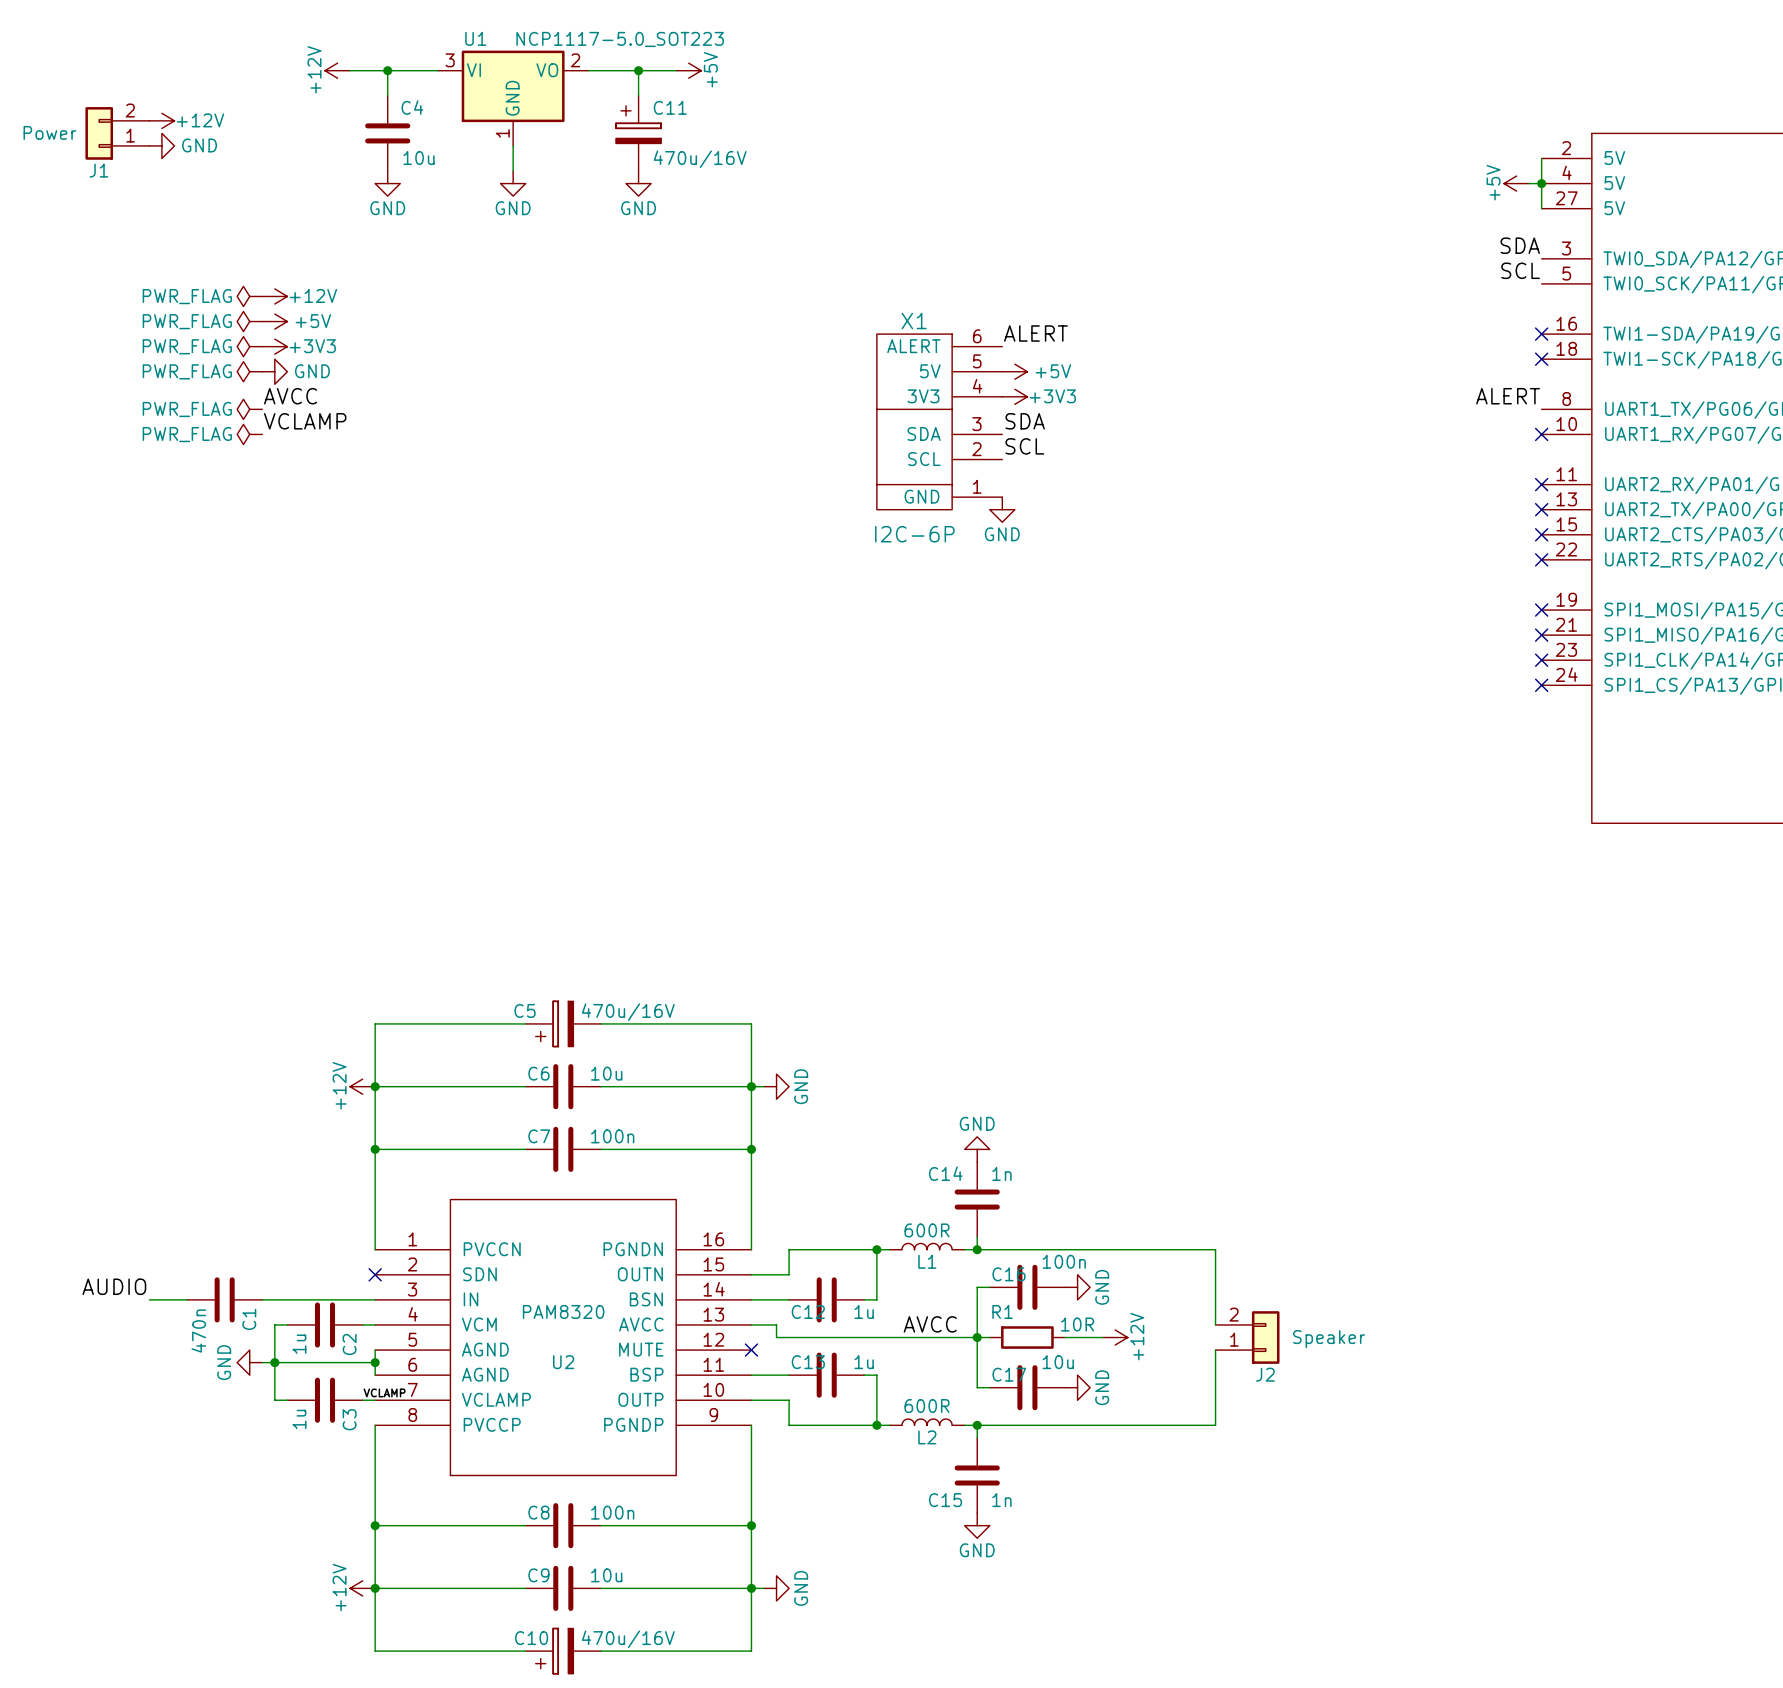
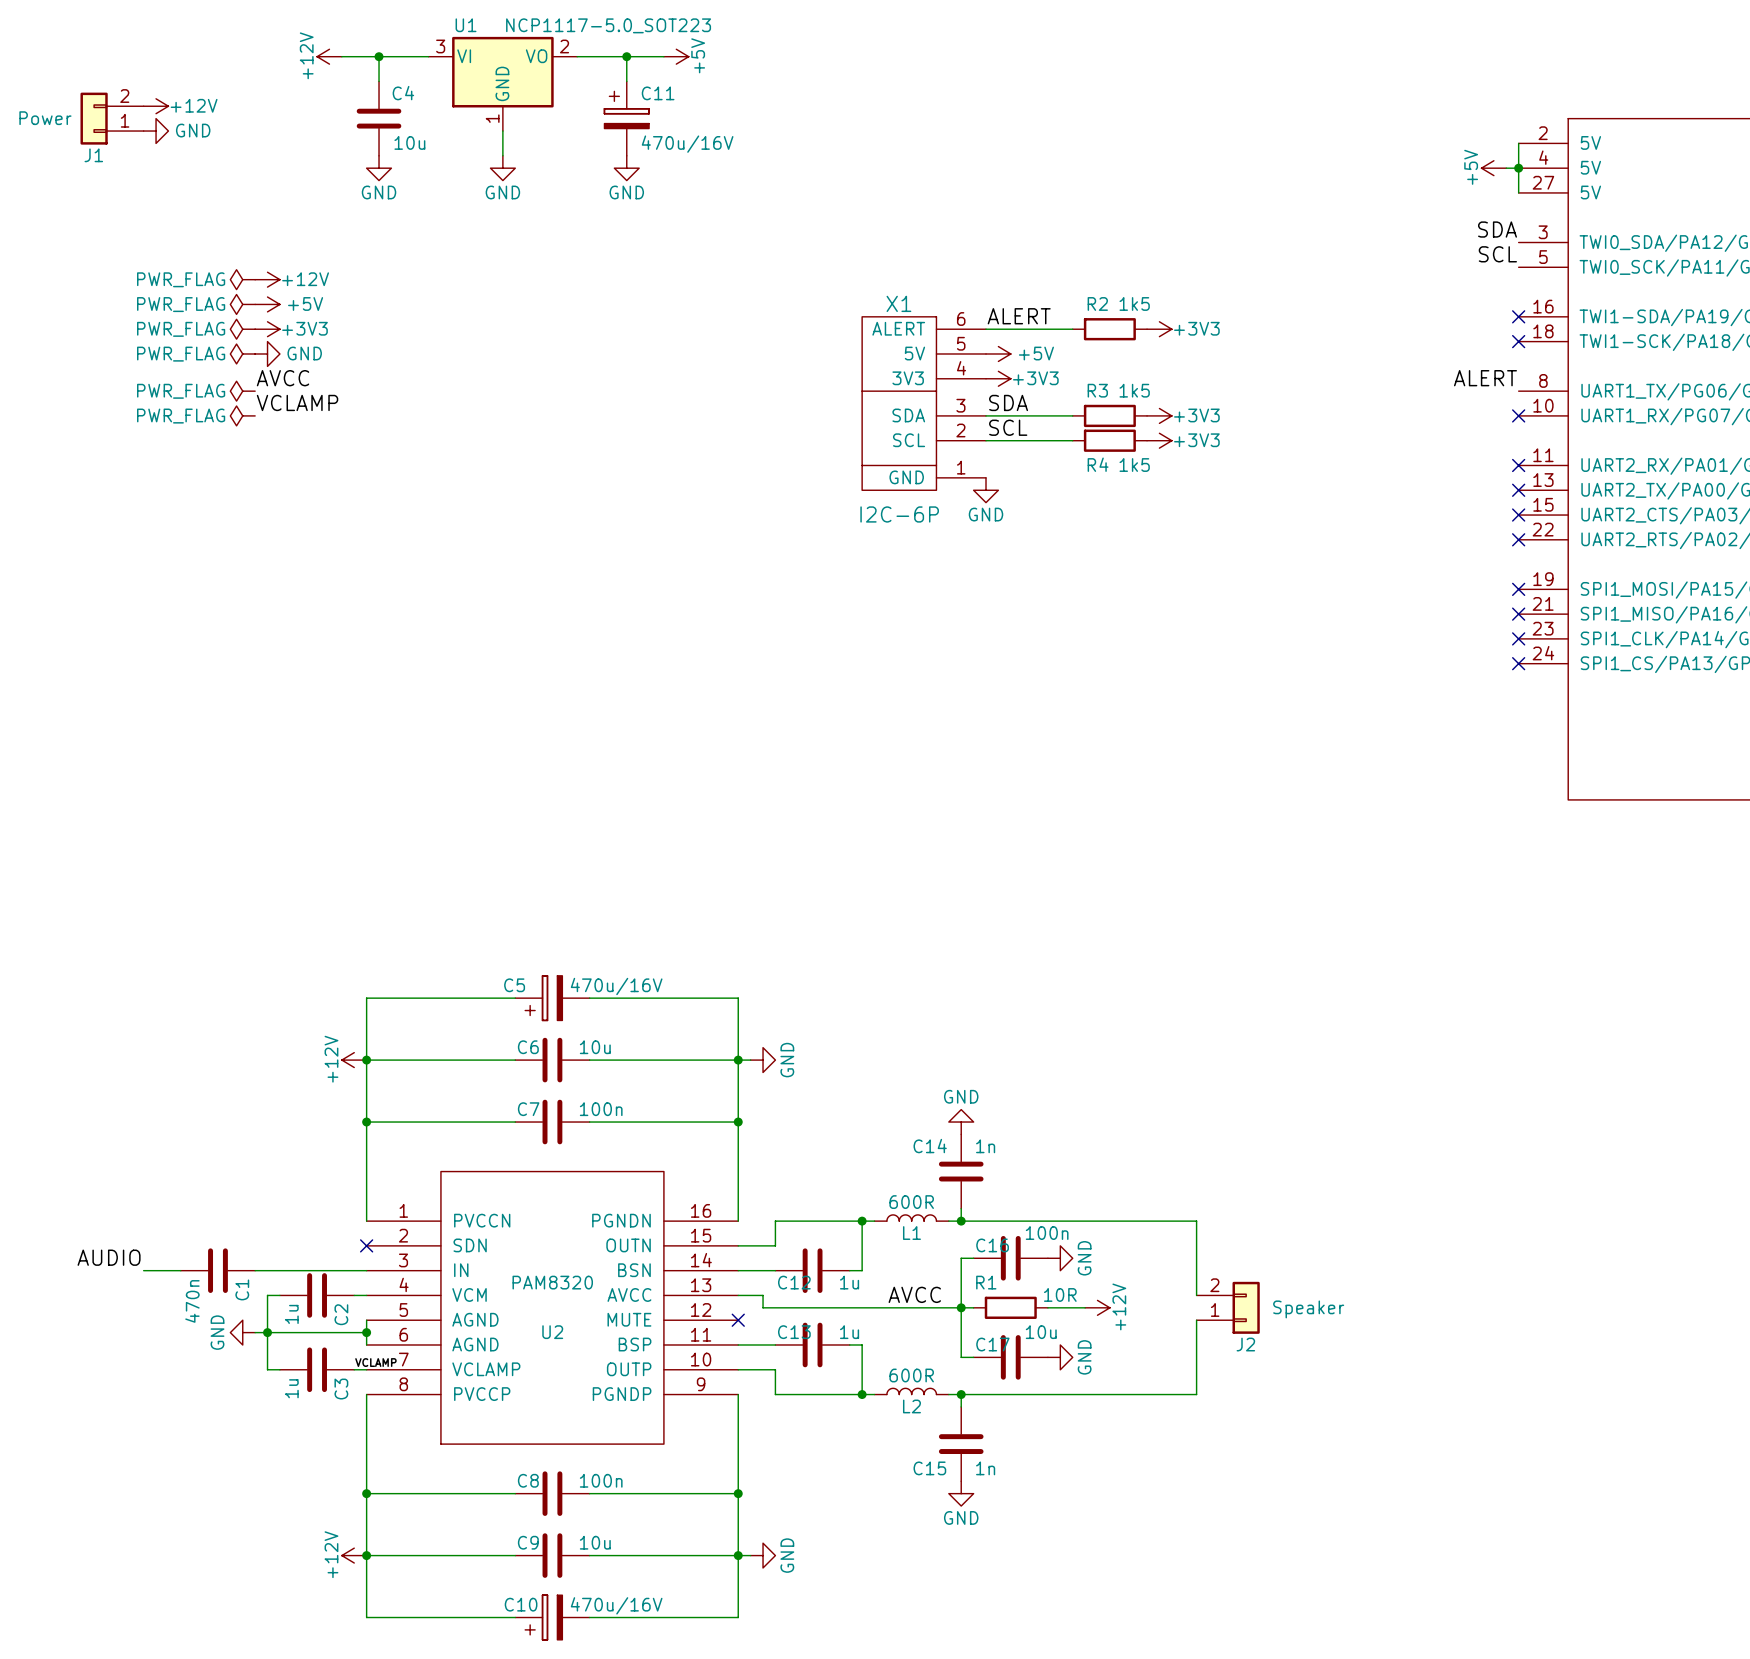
wire: none -> (986, 329) (1072, 329)
R2: none -> 1k5 (1109, 329)
power symbol: none -> +3V3 (1159, 329)
wire: none -> (986, 415) (1072, 415)
R3: none -> 1k5 (1109, 415)
power symbol: none -> +3V3 (1159, 415)
wire: none -> (986, 440) (1072, 440)
R4: none -> 1k5 (1109, 440)
power symbol: none -> +3V3 (1159, 440)

